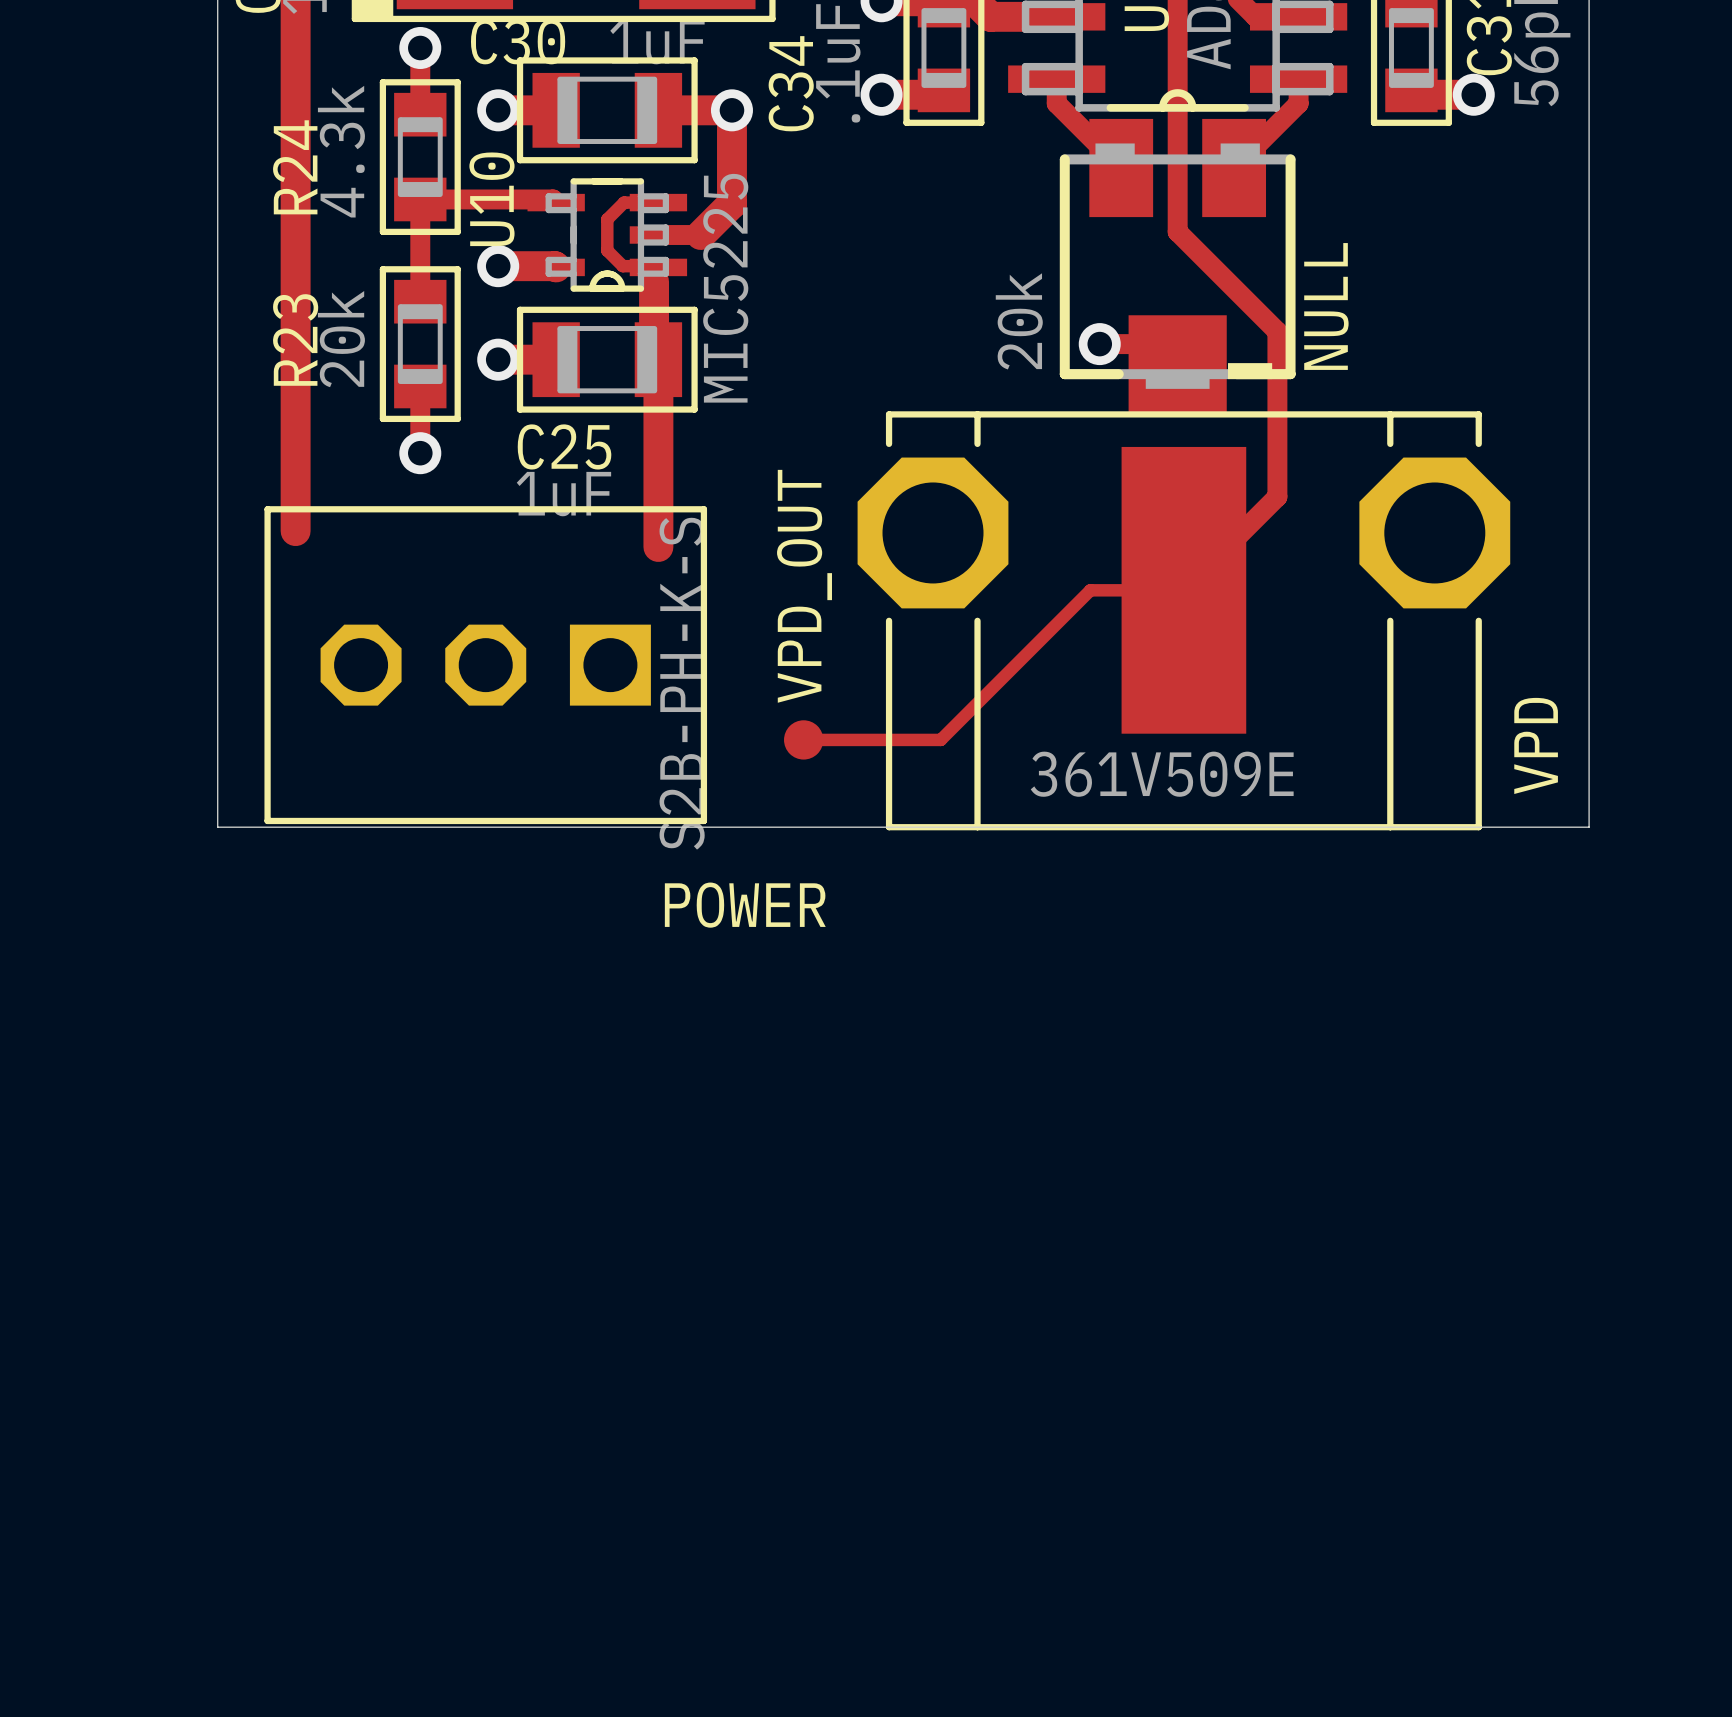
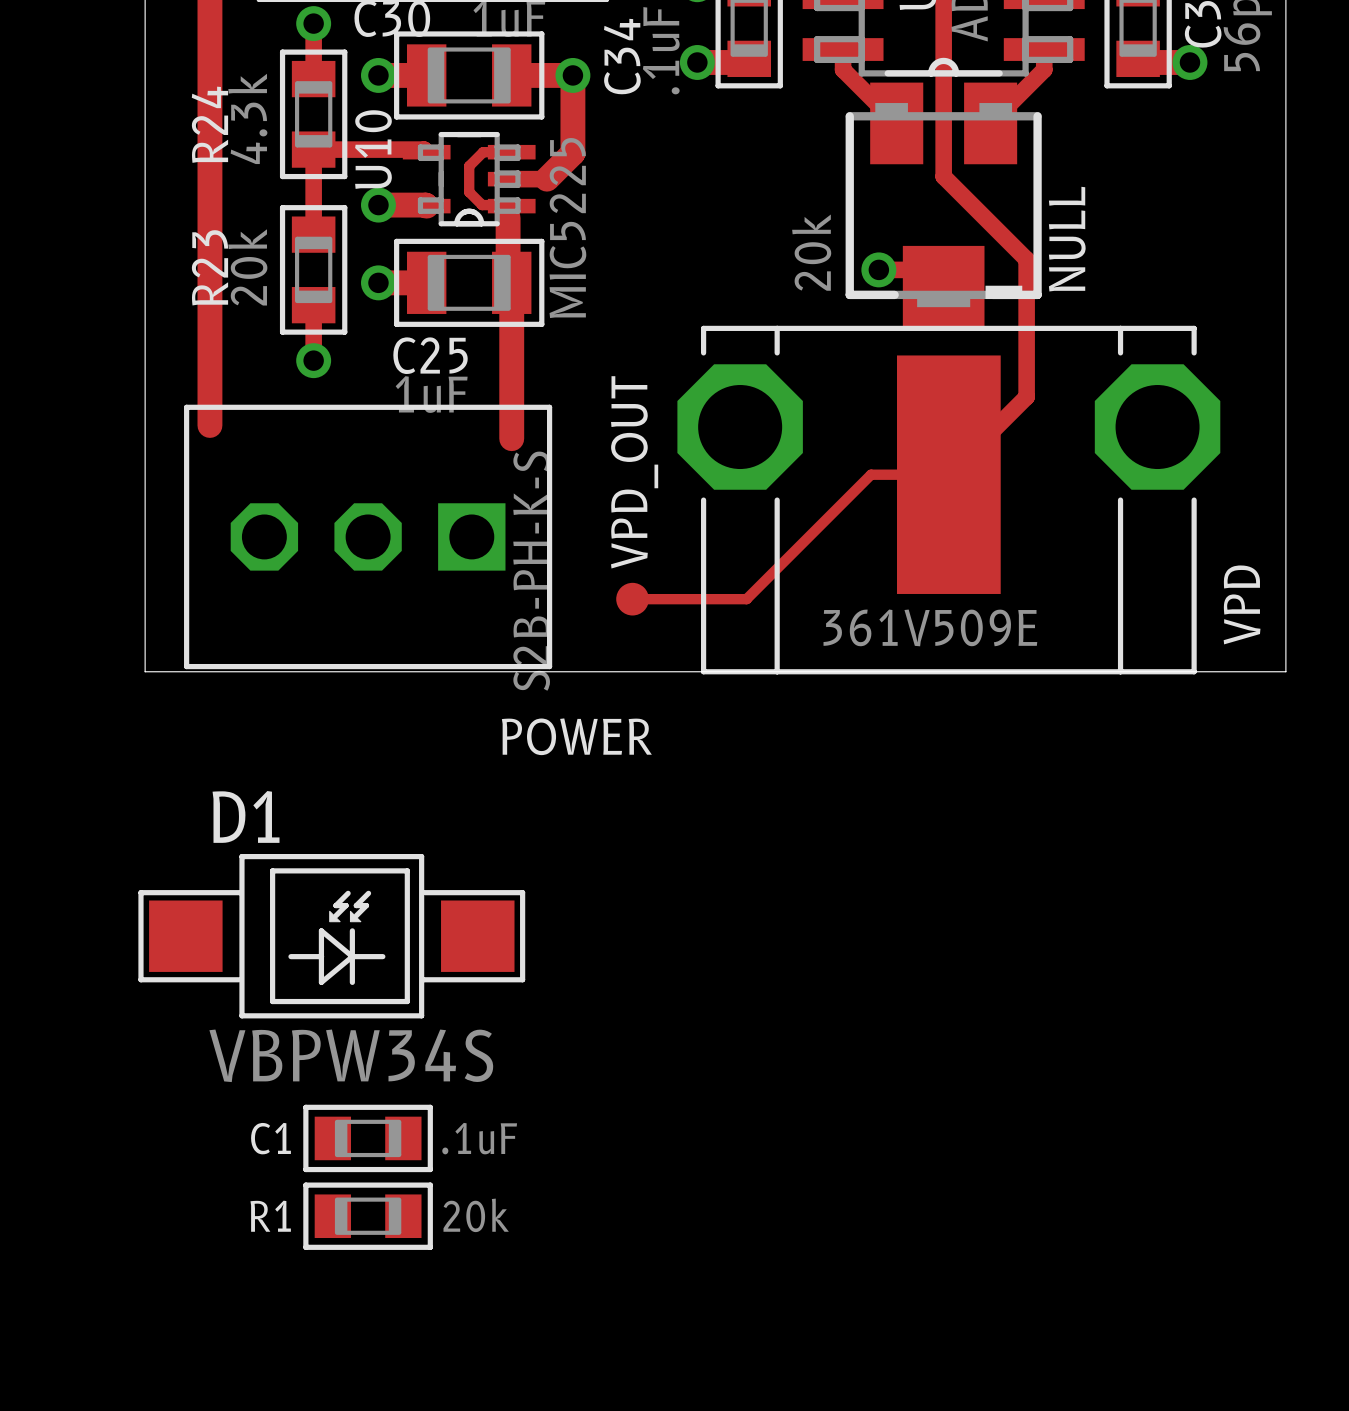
D1: none -> VBPW34S (331, 936)
C1: none -> .1uF (368, 1138)
R1: none -> 20k (368, 1216)

